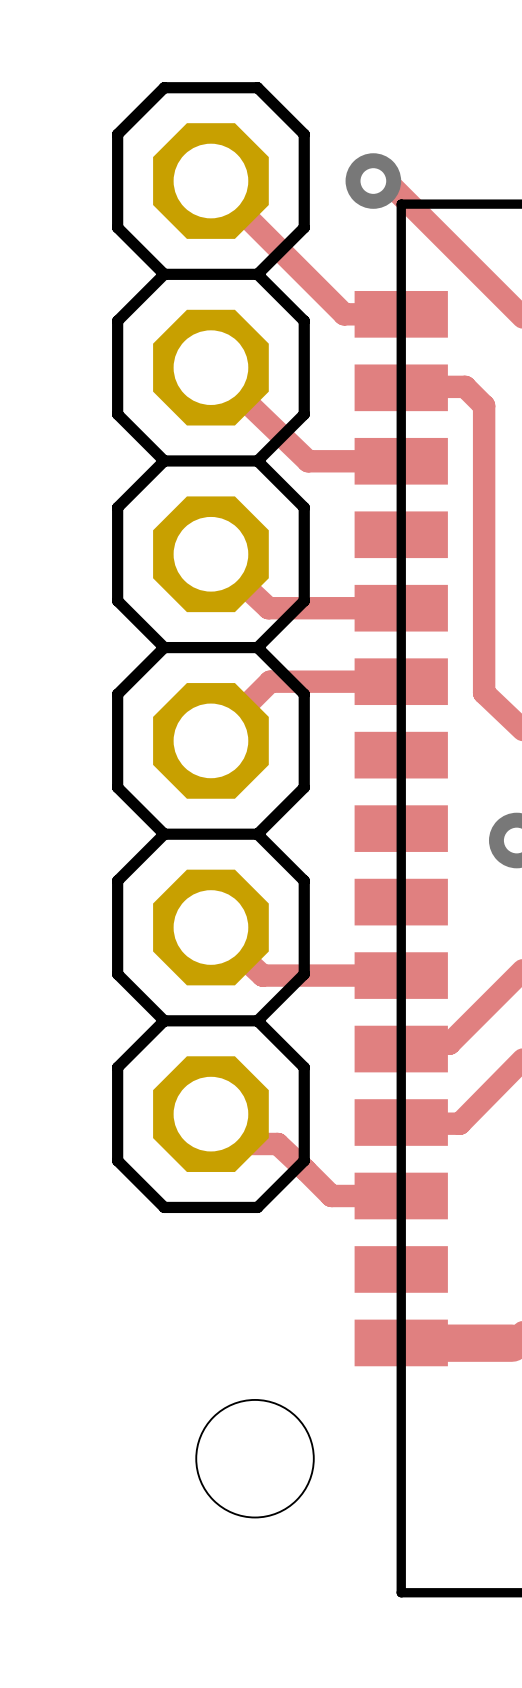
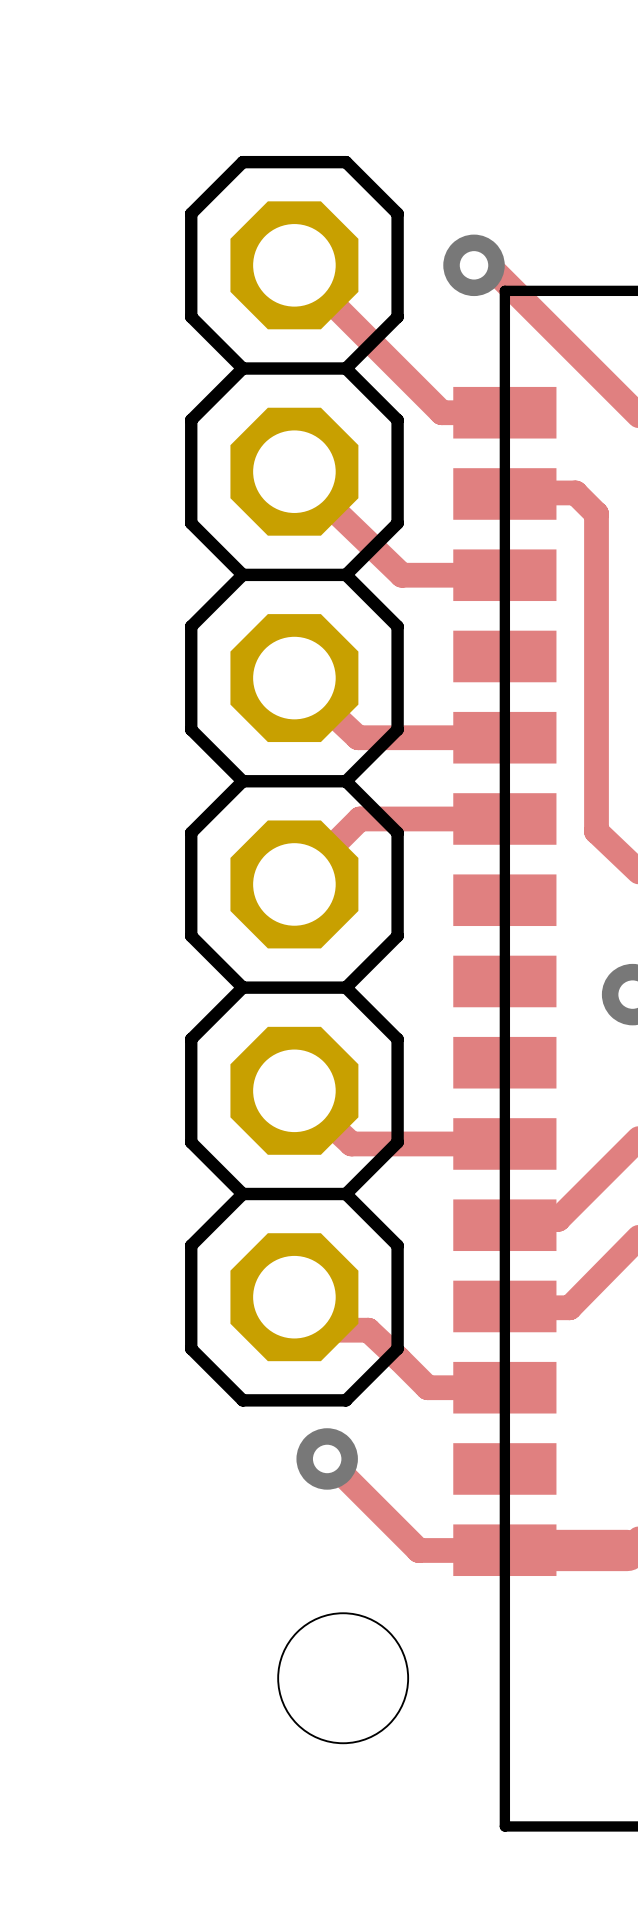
track: none -> (327, 1458) (418, 1550) (505, 1550)
via: none -> (327, 1458)

